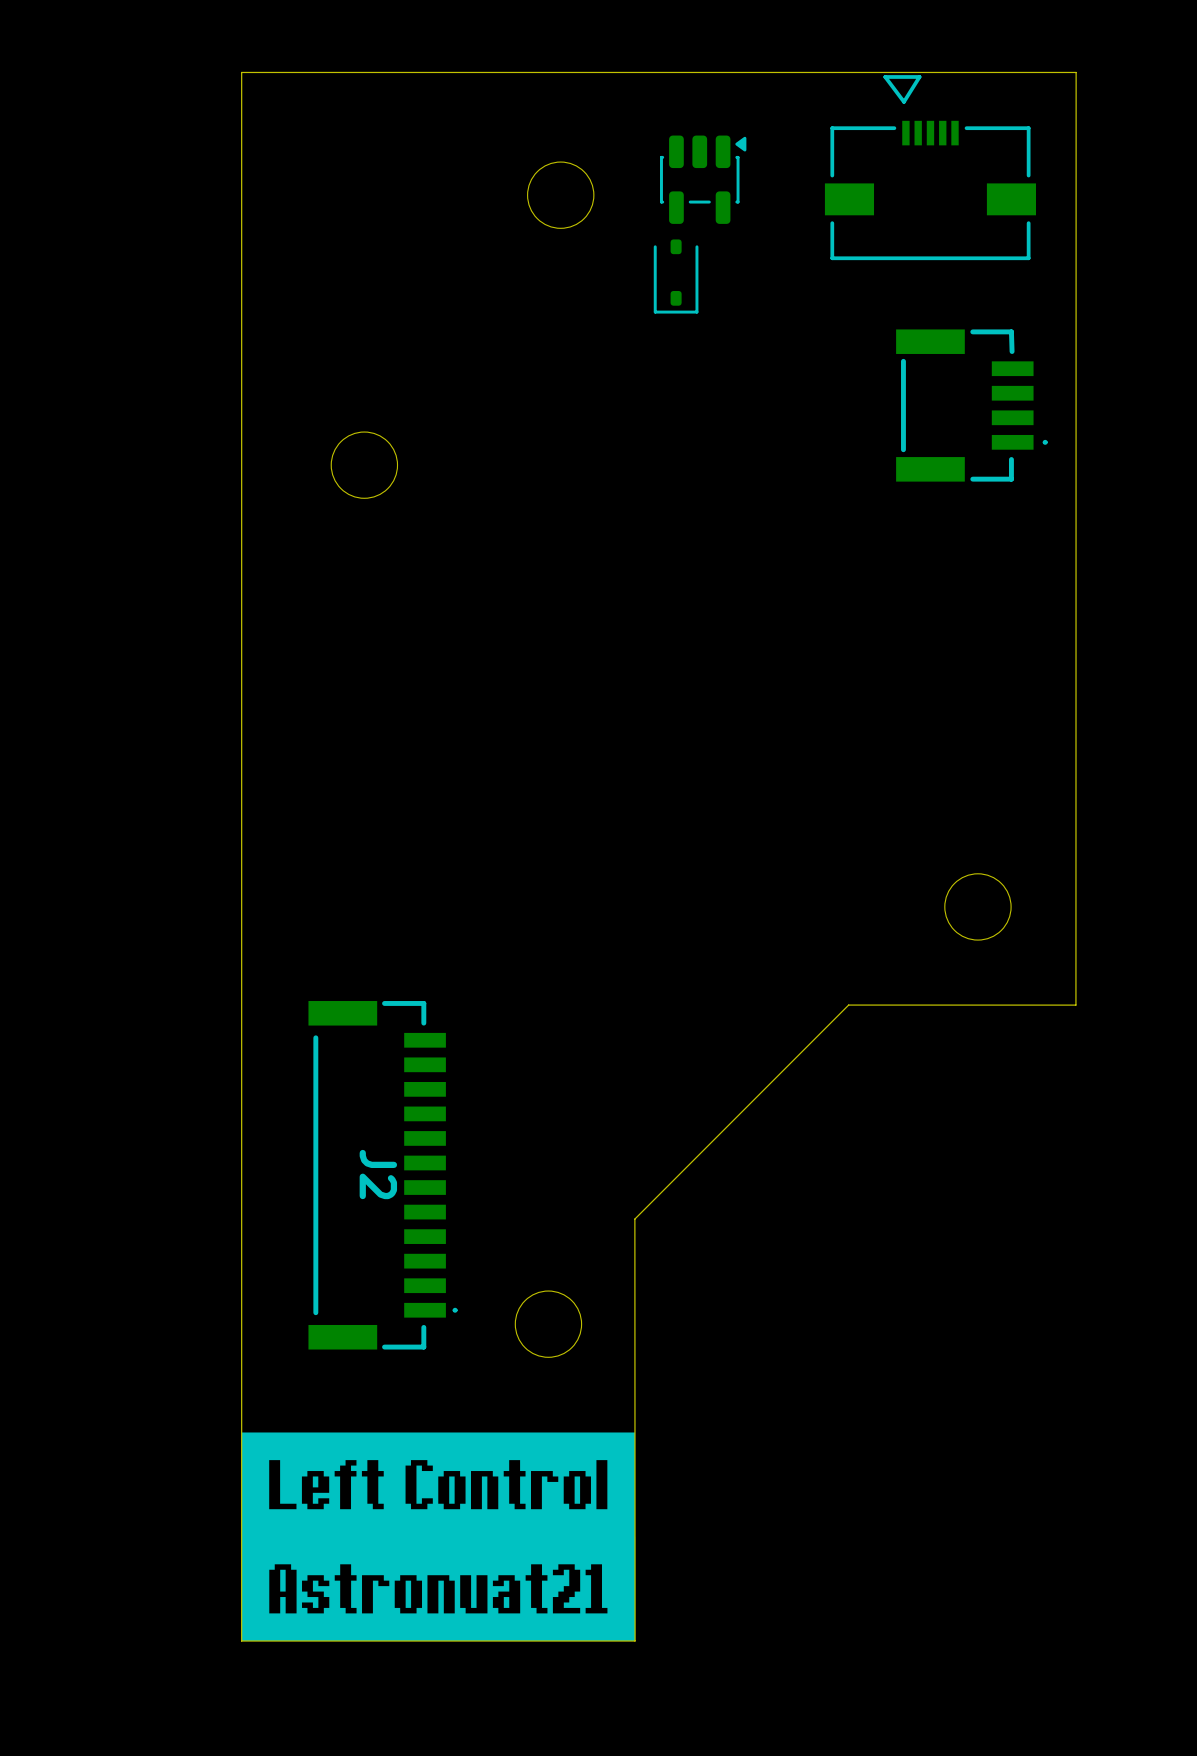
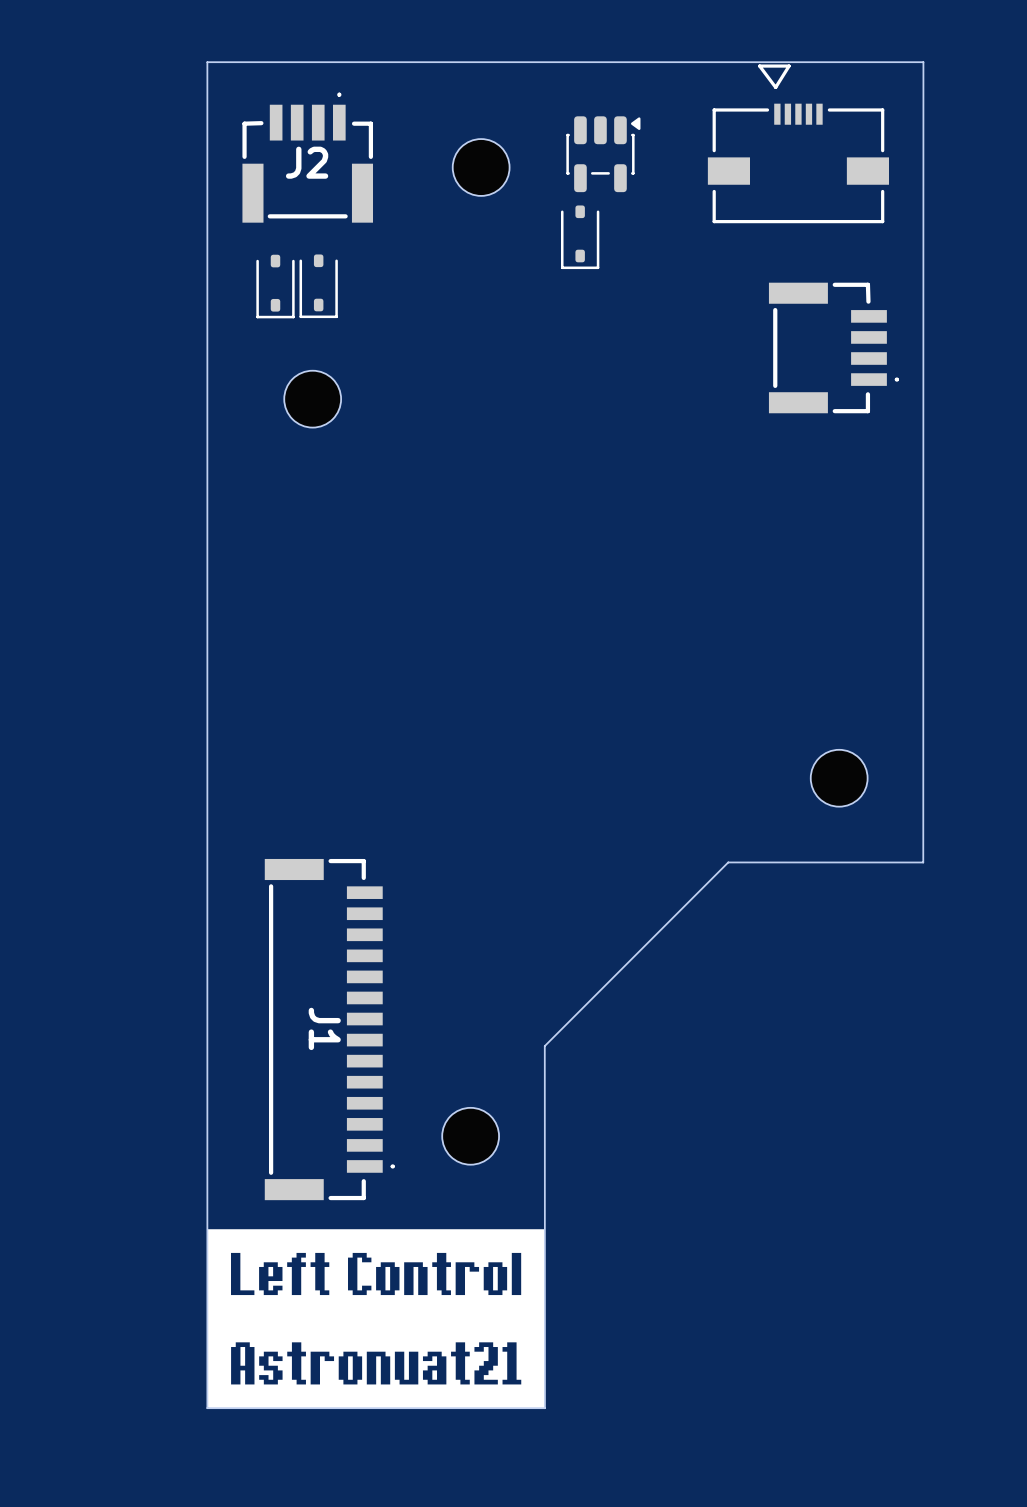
part: none -> (275, 286)
part: none -> (318, 286)
J2 footprint: [308, 1001, 458, 1350] -> [242, 92, 374, 223]
J1: none -> (329, 1029)

